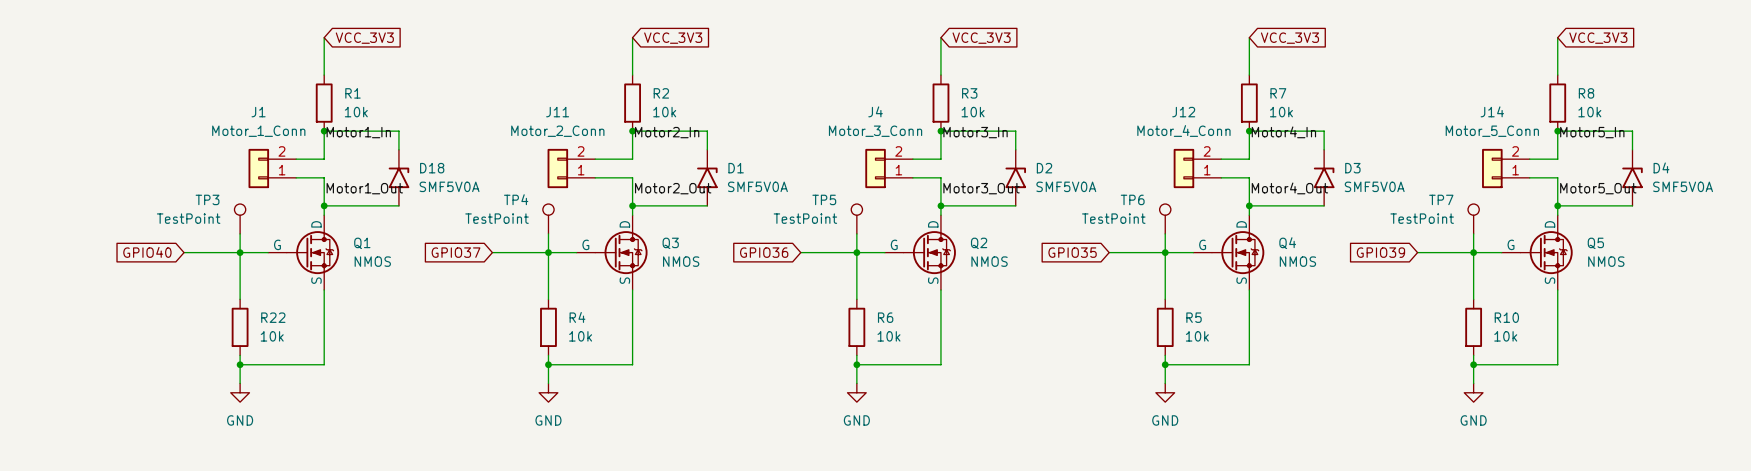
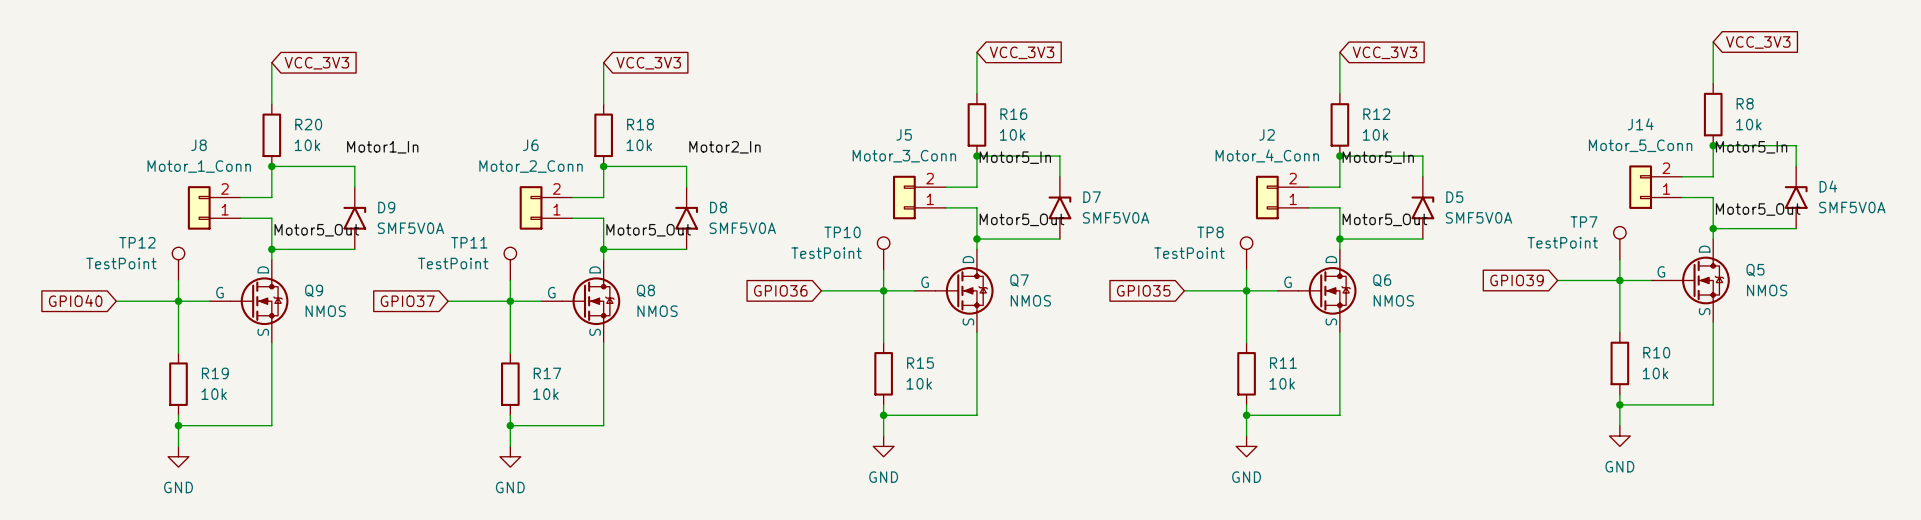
wire: (324, 37) (324, 75) -> (271, 62) (271, 104)
wire: (632, 37) (632, 75) -> (603, 62) (603, 104)
wire: (940, 37) (940, 75) -> (976, 52) (976, 93)
wire: (1249, 37) (1249, 75) -> (1339, 52) (1339, 93)
global label position: VCC_3V3 (364, 38) -> VCC_3V3 (316, 63)
global label position: VCC_3V3 (673, 38) -> VCC_3V3 (648, 63)
global label position: VCC_3V3 (981, 38) -> VCC_3V3 (1022, 52)
global label position: VCC_3V3 (1289, 38) -> VCC_3V3 (1384, 52)
R1: 10k (324, 103) -> none
R2: 10k (632, 103) -> none
R3: 10k (940, 103) -> none
R7: 10k (1249, 103) -> none
R16: none -> 10k (976, 124)
R12: none -> 10k (1339, 124)
R20: none -> 10k (271, 135)
R18: none -> 10k (603, 135)
junction: (324, 131) -> none
junction: (632, 131) -> none
junction: (940, 131) -> none
junction position: (1249, 131) -> (1339, 156)
label: Motor3_In (975, 132) -> Motor5_In (1015, 157)
label: Motor4_In (1283, 132) -> Motor5_In (1378, 157)
junction: none -> (976, 156)
junction: none -> (271, 166)
wire: (398, 149) (398, 131) (324, 131) (324, 159) (296, 159) -> (354, 187) (354, 166) (271, 166) (271, 197) (240, 197)
junction: none -> (603, 166)
wire: (632, 149) (632, 131) (707, 131) (707, 149) -> (686, 166) (603, 166) (603, 197) (572, 197)
wire: (1015, 149) (1015, 131) (940, 131) (940, 159) (912, 159) -> (1059, 176) (1059, 156) (976, 156) (976, 187) (945, 187)
wire: (1324, 149) (1324, 131) (1249, 131) (1249, 159) (1221, 159) -> (1422, 176) (1422, 156) (1339, 156) (1339, 187) (1308, 187)
wire: (595, 159) (632, 159) -> (686, 187) (686, 176)
J1: Motor_1_Conn (272, 168) -> none
J11: Motor_2_Conn (571, 168) -> none
J4: Motor_3_Conn (889, 168) -> none
J12: Motor_4_Conn (1197, 168) -> none
wire: (296, 177) (324, 177) (324, 215) -> (240, 218) (271, 218) (271, 259)
D18: SMF5V0A (398, 177) -> none
wire: (595, 177) (632, 177) (632, 215) -> none
D1: SMF5V0A (707, 177) -> none
J5: none -> Motor_3_Conn (919, 197)
wire: (912, 177) (940, 177) (940, 215) -> (945, 207) (976, 207) (976, 249)
D2: SMF5V0A (1015, 177) -> none
J2: none -> Motor_4_Conn (1282, 197)
wire: (1221, 177) (1249, 177) (1249, 215) -> (1308, 207) (1339, 207) (1339, 249)
D3: SMF5V0A (1324, 177) -> none
J8: none -> Motor_1_Conn (214, 207)
J6: none -> Motor_2_Conn (546, 207)
D7: none -> SMF5V0A (1059, 207)
D5: none -> SMF5V0A (1422, 207)
label: Motor1_Out (364, 188) -> Motor5_Out (316, 230)
label: Motor2_Out (673, 188) -> Motor5_Out (648, 230)
label: Motor3_Out (981, 188) -> Motor5_Out (1021, 219)
label: Motor4_Out (1289, 188) -> Motor5_Out (1384, 219)
D9: none -> SMF5V0A (354, 218)
wire: none -> (572, 218) (603, 218) (603, 259)
D8: none -> SMF5V0A (686, 218)
wire: (324, 205) (398, 205) -> (271, 249) (354, 249)
junction: (324, 205) -> none
wire: (632, 205) (707, 205) -> (603, 249) (686, 249)
junction: (632, 205) -> none
wire: (940, 205) (1015, 205) -> (976, 239) (1059, 239)
junction: (940, 205) -> none
wire: (1249, 205) (1324, 205) -> (1339, 239) (1422, 239)
junction position: (1249, 205) -> (1339, 239)
junction: none -> (976, 239)
TP3: TestPoint (240, 218) -> none
TP4: TestPoint (548, 218) -> none
TP5: TestPoint (856, 218) -> none
TP6: TestPoint (1165, 218) -> none
TP10: none -> TestPoint (883, 253)
TP8: none -> TestPoint (1246, 253)
wire: (240, 233) (240, 299) -> (178, 280) (178, 353)
wire: (548, 233) (548, 299) -> (510, 280) (510, 353)
wire: (856, 233) (856, 299) -> (883, 270) (883, 342)
wire: (1165, 233) (1165, 299) -> (1246, 270) (1246, 342)
TP12: none -> TestPoint (178, 263)
TP11: none -> TestPoint (510, 263)
global label position: GPIO40 (147, 252) -> GPIO40 (75, 300)
wire: (184, 252) (268, 252) -> (116, 301) (209, 301)
junction position: (240, 252) -> (271, 249)
Q1: NMOS (303, 252) -> none
global label position: GPIO37 (456, 252) -> GPIO37 (407, 301)
wire: (492, 252) (576, 252) -> (448, 301) (541, 301)
junction position: (548, 252) -> (603, 249)
Q3: NMOS (612, 252) -> none
global label position: GPIO36 (764, 252) -> GPIO36 (780, 290)
wire: (800, 252) (884, 252) -> (821, 290) (914, 290)
junction: (856, 252) -> none
Q2: NMOS (920, 252) -> none
global label position: GPIO35 (1072, 252) -> GPIO35 (1143, 290)
wire: (1109, 252) (1193, 252) -> (1184, 290) (1277, 290)
junction position: (1165, 252) -> (1246, 290)
Q4: NMOS (1228, 252) -> none
junction: none -> (883, 290)
Q7: none -> NMOS (954, 290)
Q6: none -> NMOS (1317, 290)
junction: none -> (178, 301)
Q9: none -> NMOS (249, 301)
junction: none -> (510, 301)
Q8: none -> NMOS (580, 301)
wire: (324, 289) (324, 364) (240, 364) -> (271, 342) (271, 425) (178, 425)
wire: (632, 289) (632, 364) (548, 364) -> (603, 342) (603, 425) (510, 425)
wire: (940, 289) (940, 364) (856, 364) -> (976, 332) (976, 415) (883, 415)
wire: (1249, 289) (1249, 364) (1165, 364) -> (1339, 332) (1339, 415) (1246, 415)
R22: 10k (240, 327) -> none
R4: 10k (548, 327) -> none
R6: 10k (856, 327) -> none
R5: 10k (1165, 327) -> none
R15: none -> 10k (883, 373)
R11: none -> 10k (1246, 373)
R19: none -> 10k (178, 384)
R17: none -> 10k (510, 384)
wire: (240, 355) (240, 383) -> (178, 415) (178, 446)
wire: (548, 355) (548, 383) -> (510, 415) (510, 446)
wire: (856, 355) (856, 383) -> (883, 404) (883, 436)
wire: (1165, 355) (1165, 383) -> (1246, 404) (1246, 436)
junction: (240, 364) -> none
junction: (548, 364) -> none
junction: (856, 364) -> none
junction position: (1165, 364) -> (1246, 415)
junction: none -> (883, 415)
junction: none -> (178, 425)
junction: none -> (510, 425)
power symbol position: GND (240, 392) -> GND (178, 456)
power symbol position: GND (548, 392) -> GND (510, 456)
power symbol position: GND (856, 392) -> GND (883, 446)
power symbol position: GND (1165, 392) -> GND (1246, 446)

